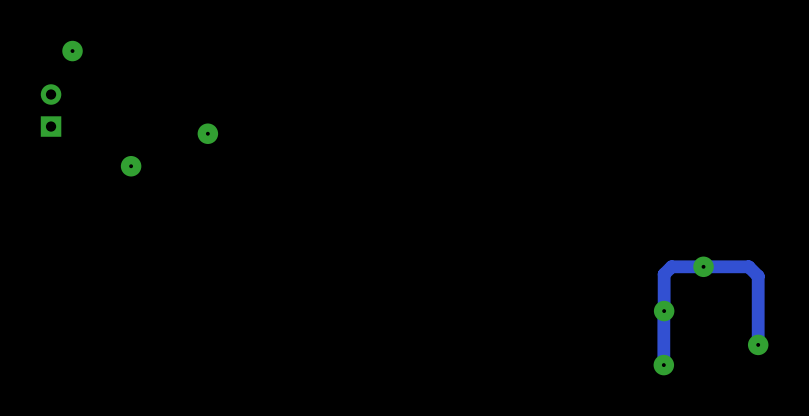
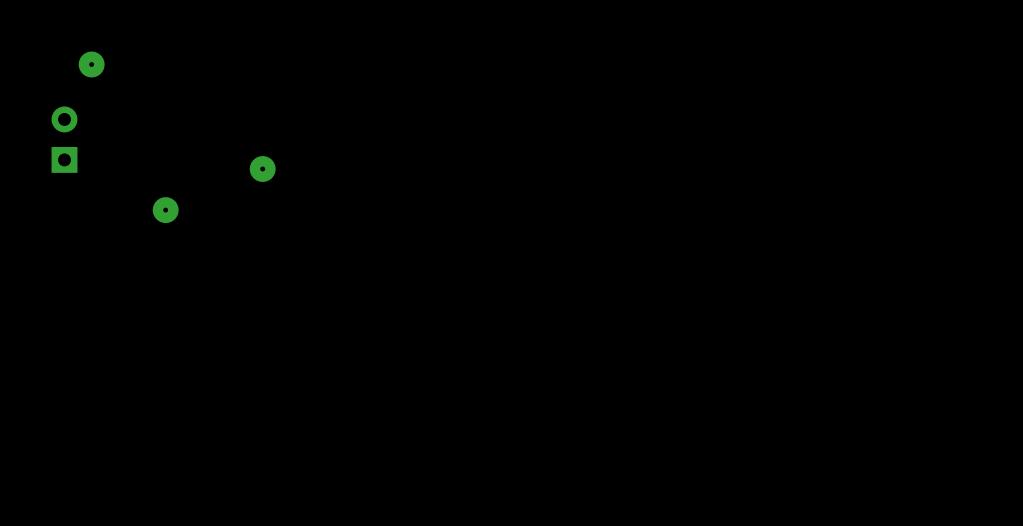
via: (703, 266) -> none
via: (664, 311) -> none
track: (758, 344) (758, 276) (748, 266) (671, 266) (664, 274) (663, 365) -> none
via: (758, 344) -> none
via: (663, 365) -> none

